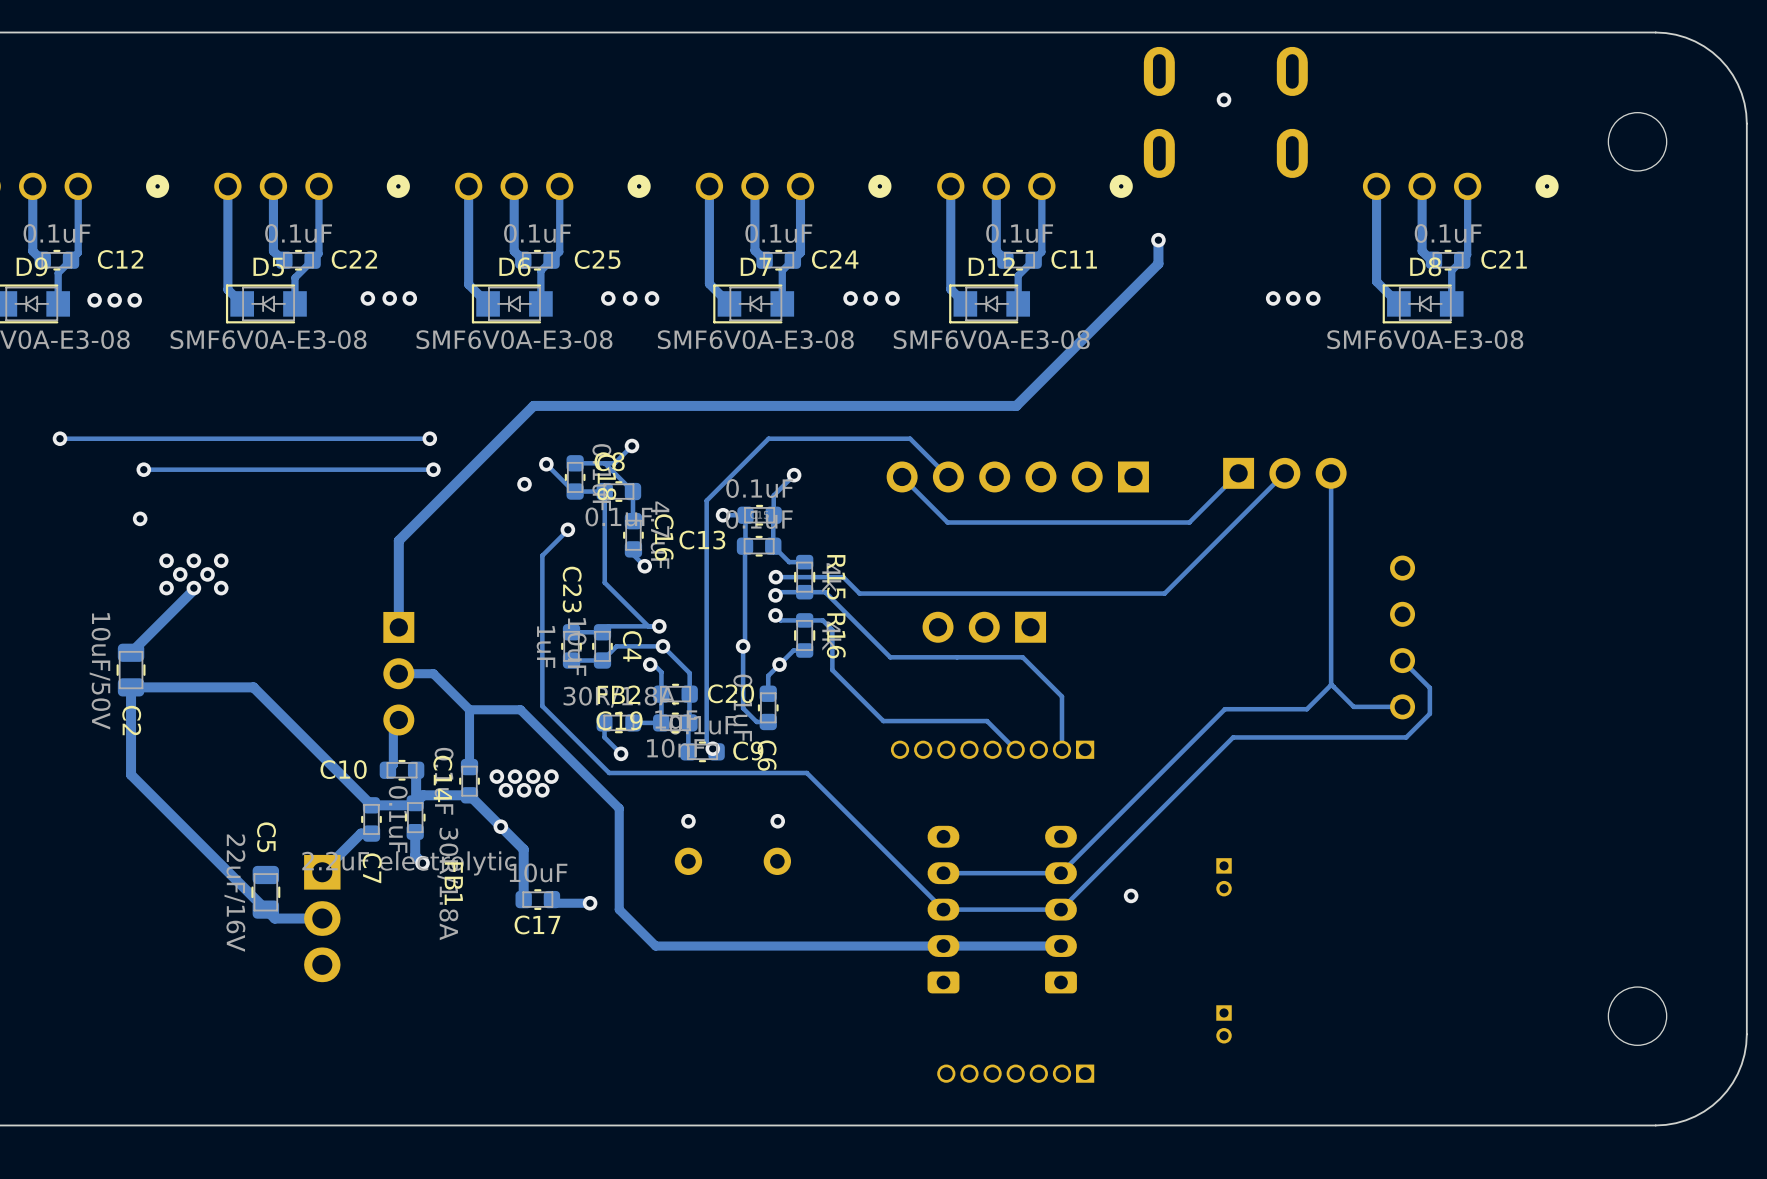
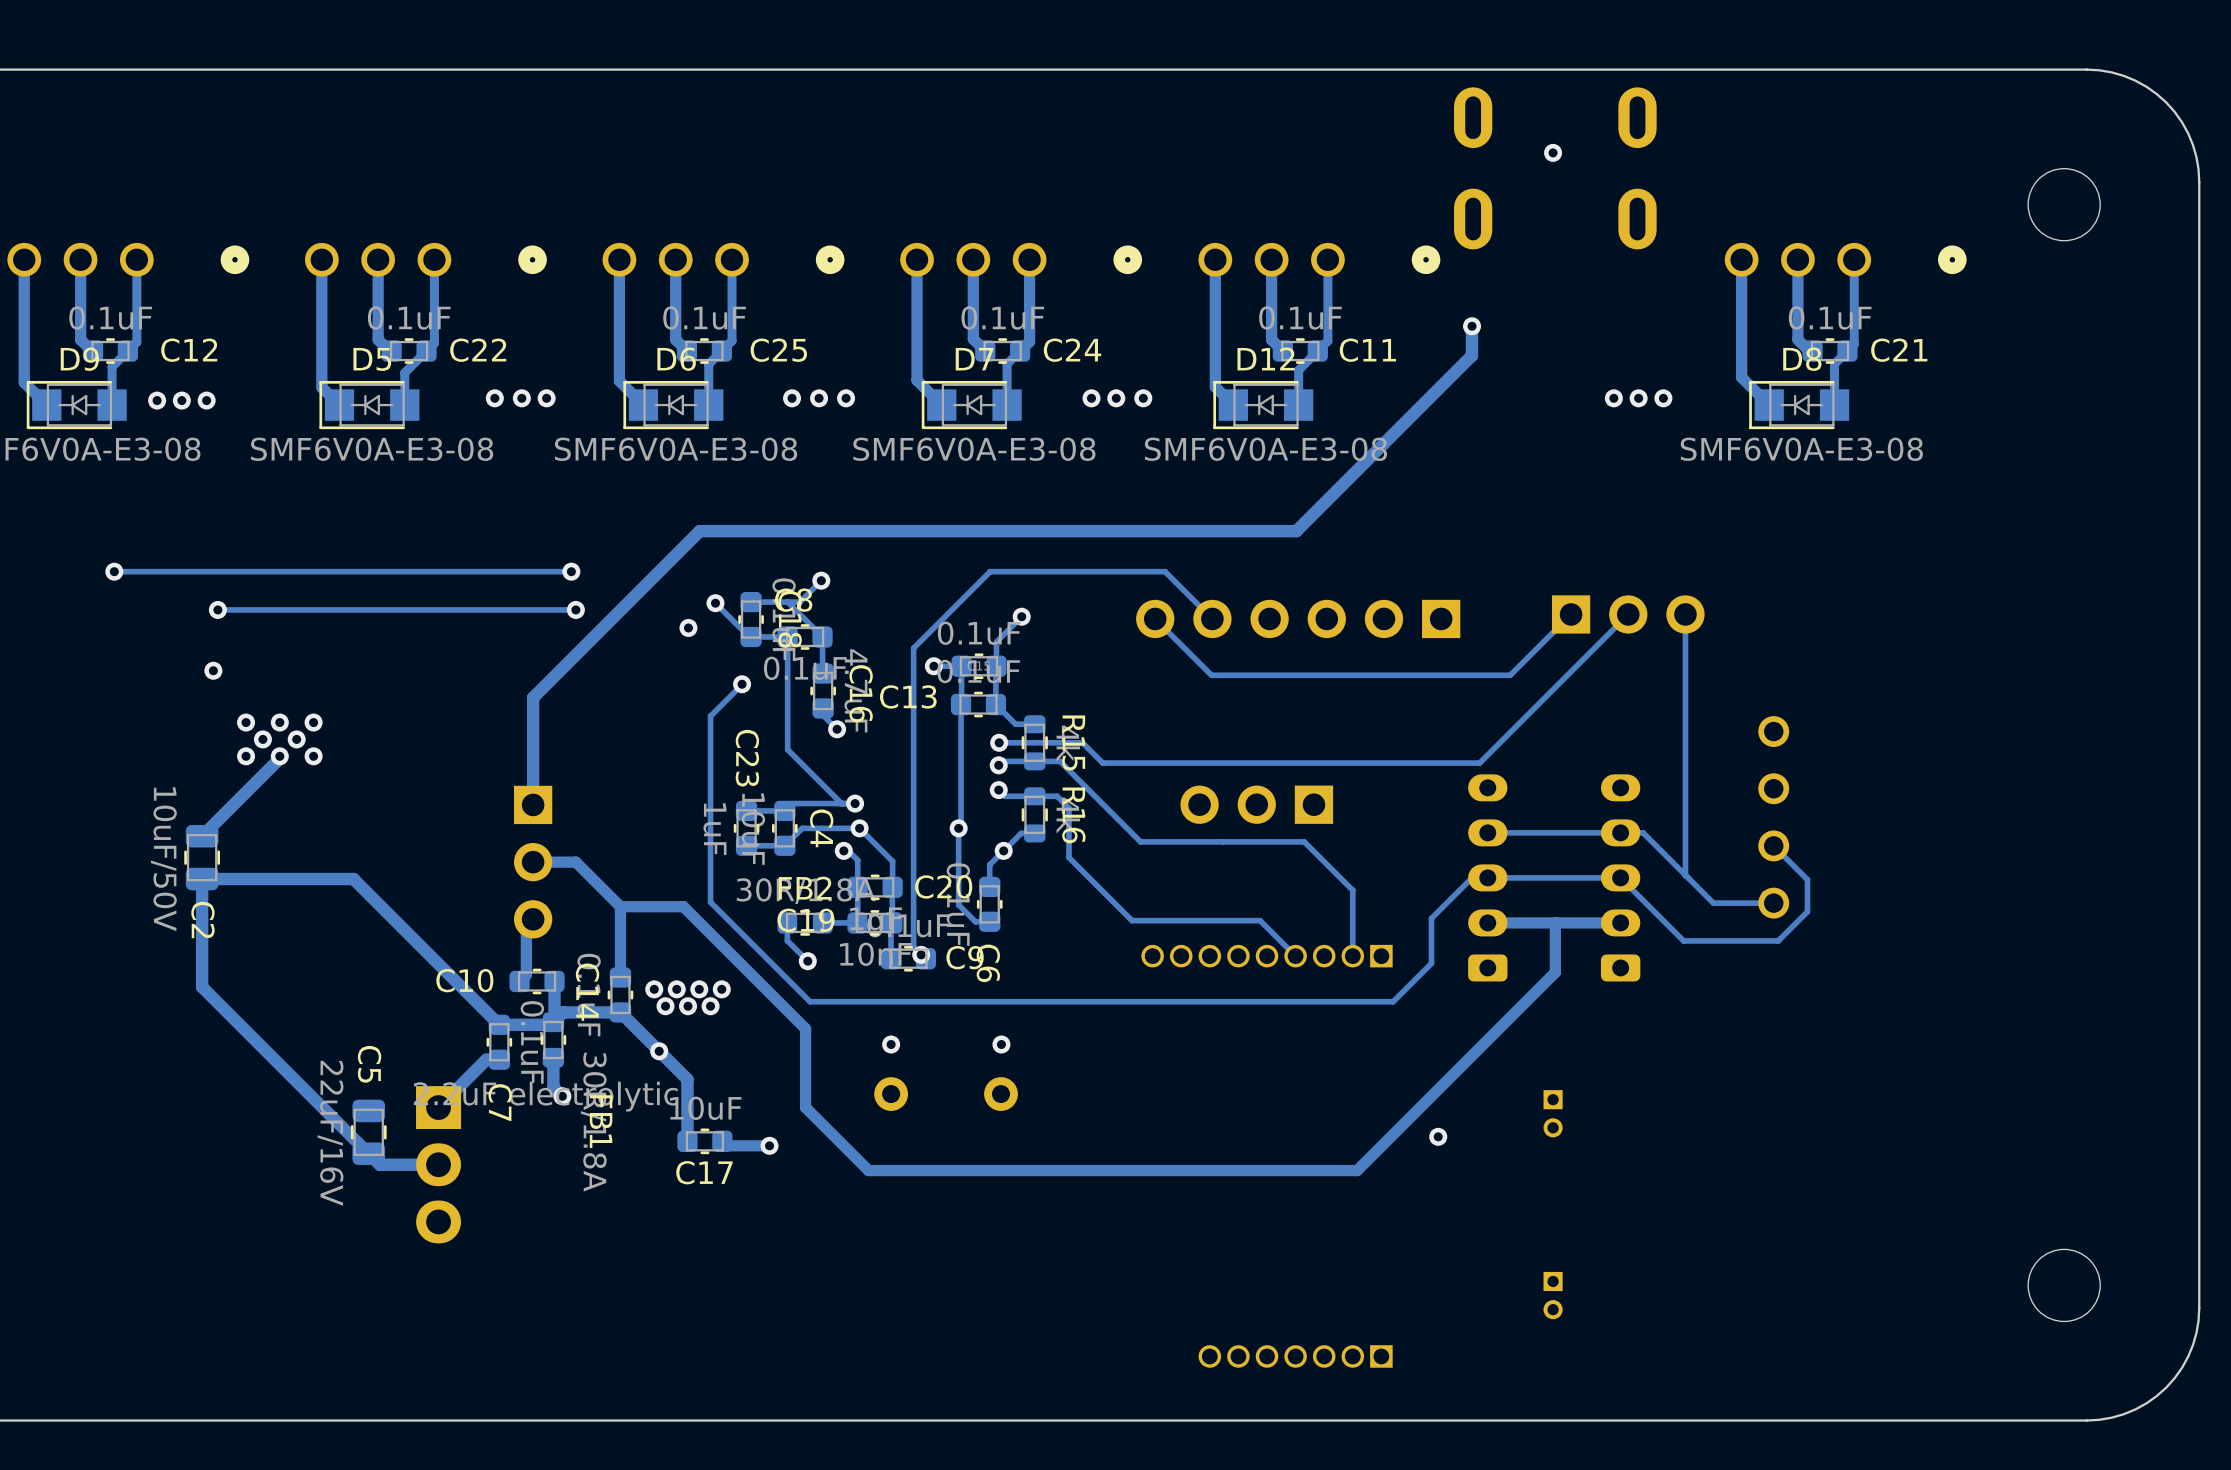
track: none -> (1487, 832) (1643, 832) (1685, 875)
track: (1331, 685) (1306, 709) (1224, 709) (1060, 873) (943, 873) -> none
part: none -> (1487, 877)
part: none -> (1620, 877)
track: none -> (1620, 922) (1487, 922)
track: (1329, 737) (1233, 737) (1060, 909) (943, 909) (806, 772) (609, 772) -> (1683, 940) (1620, 877) (1472, 877) (1431, 918) (1431, 963) (1393, 1001) (810, 1001) (793, 984)
track: (619, 872) (619, 909) (655, 946) (1060, 946) -> (805, 1107) (868, 1170) (1357, 1170) (1555, 972) (1555, 922)
part: (943, 909) -> none
part: (1060, 909) -> none

